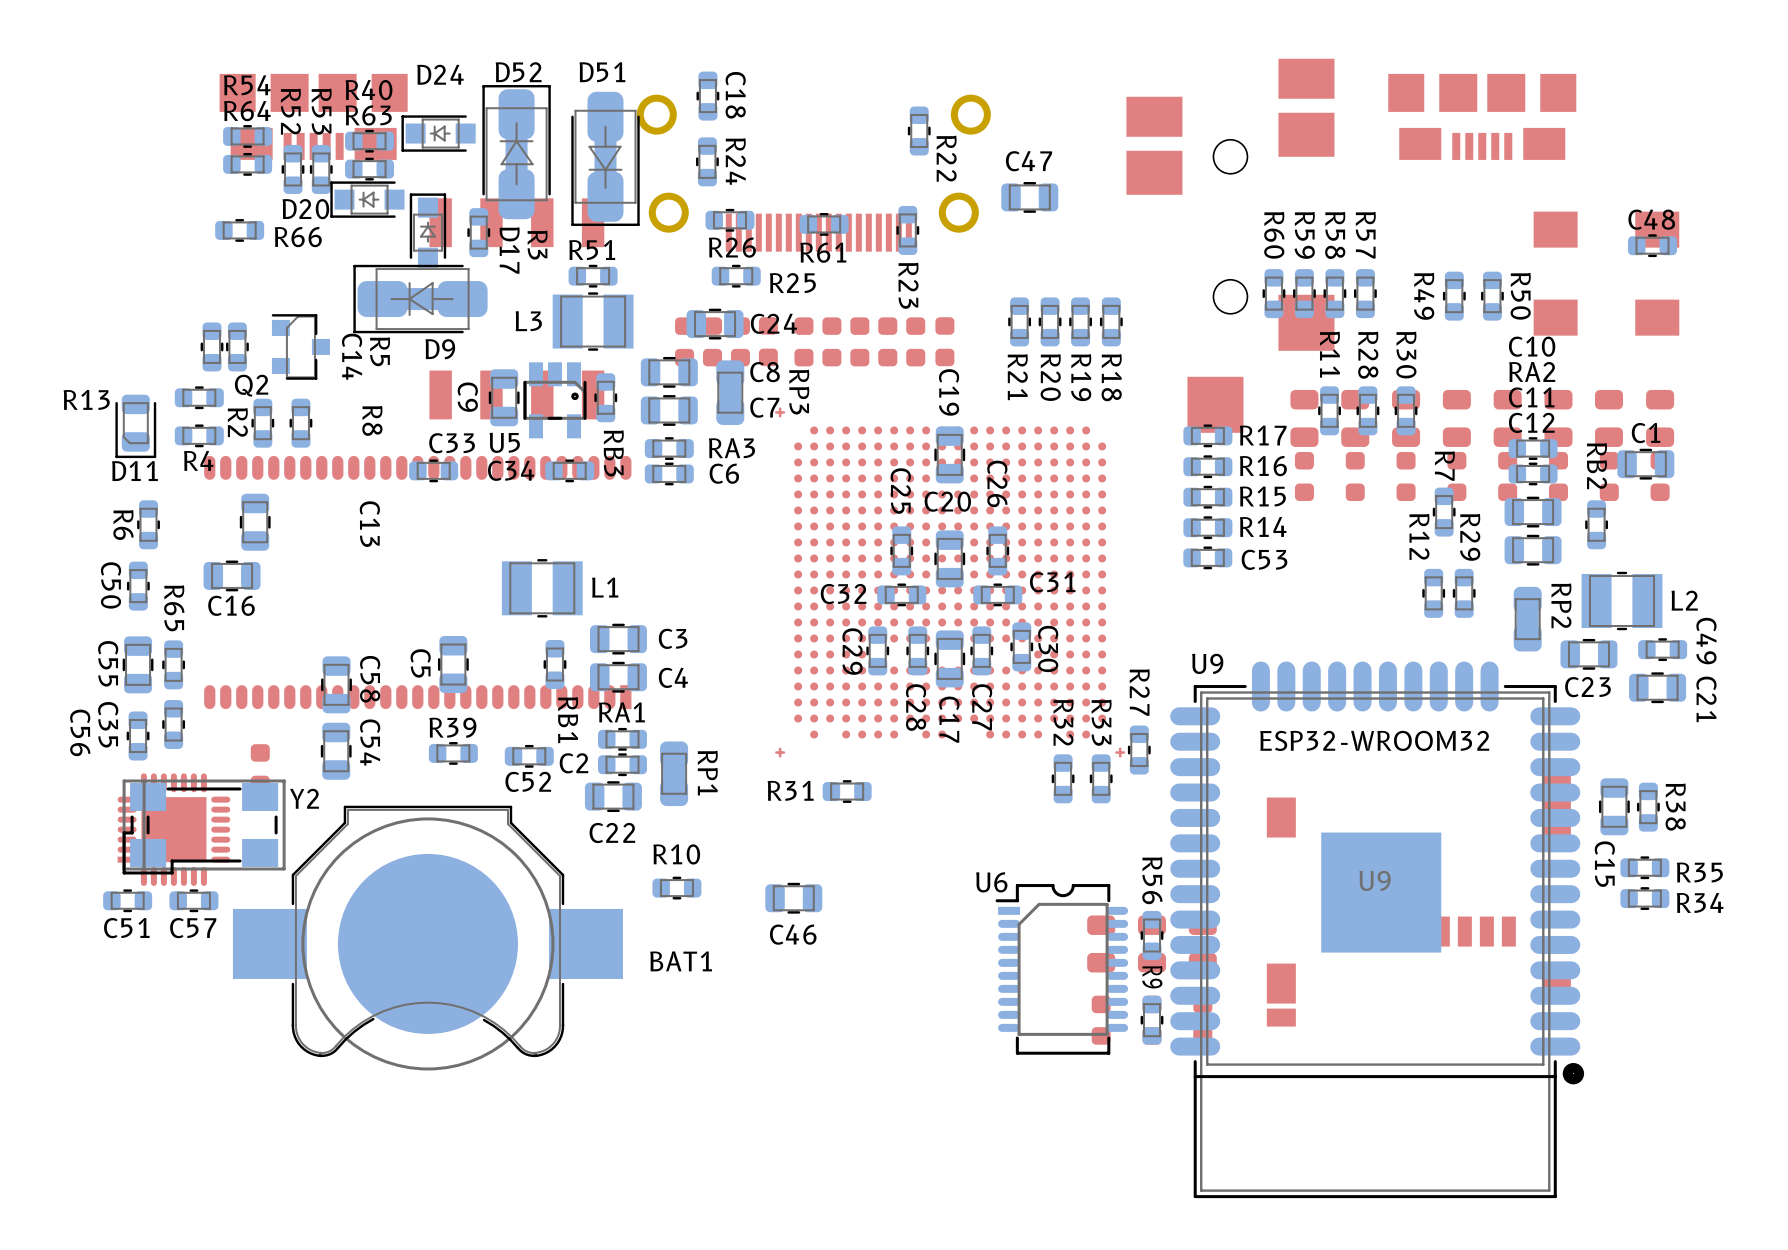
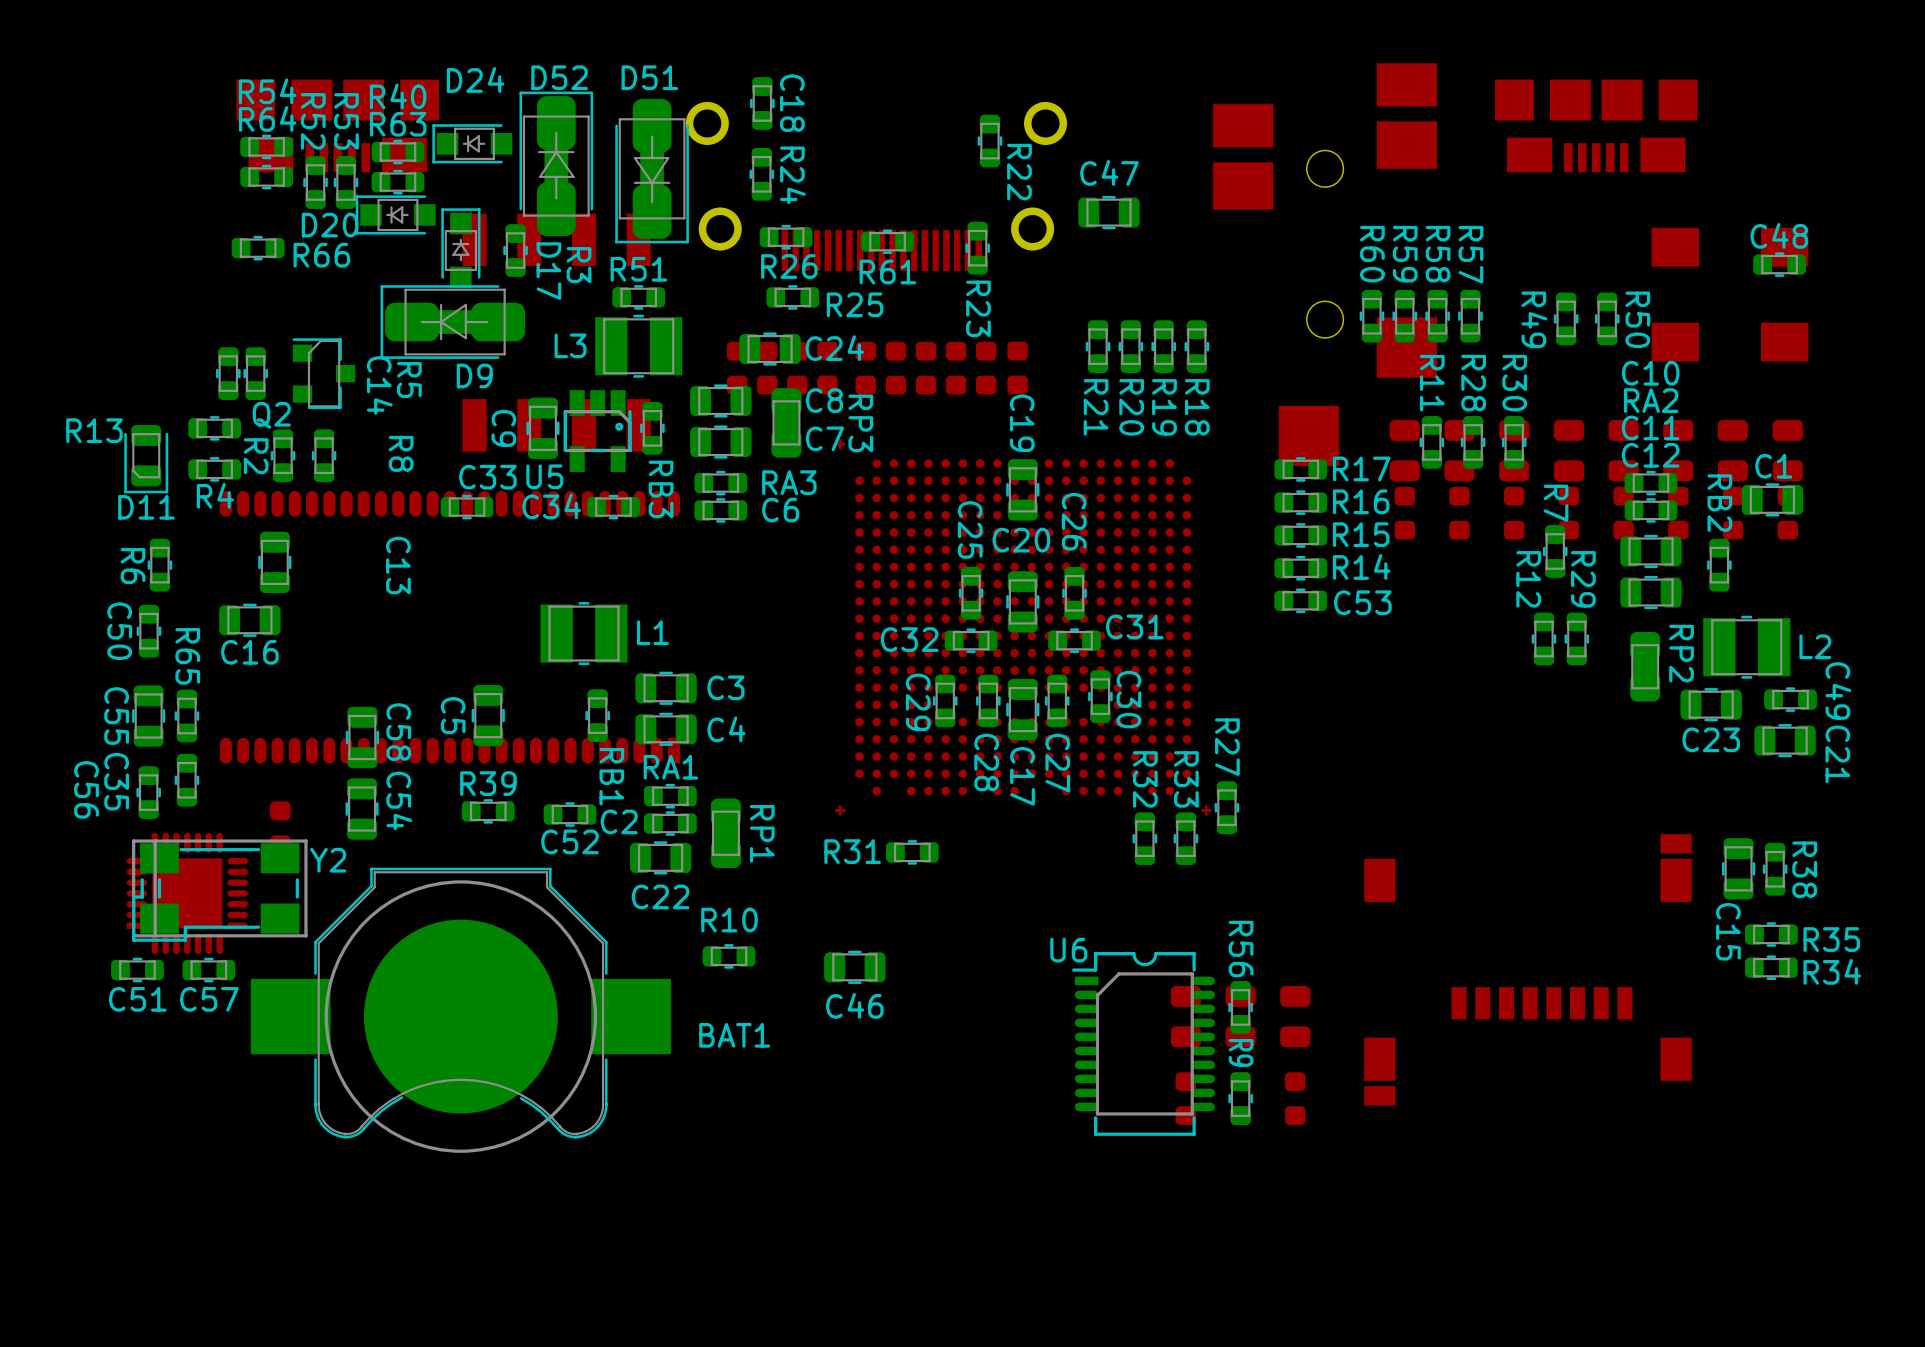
U9: (1377, 929) -> none

